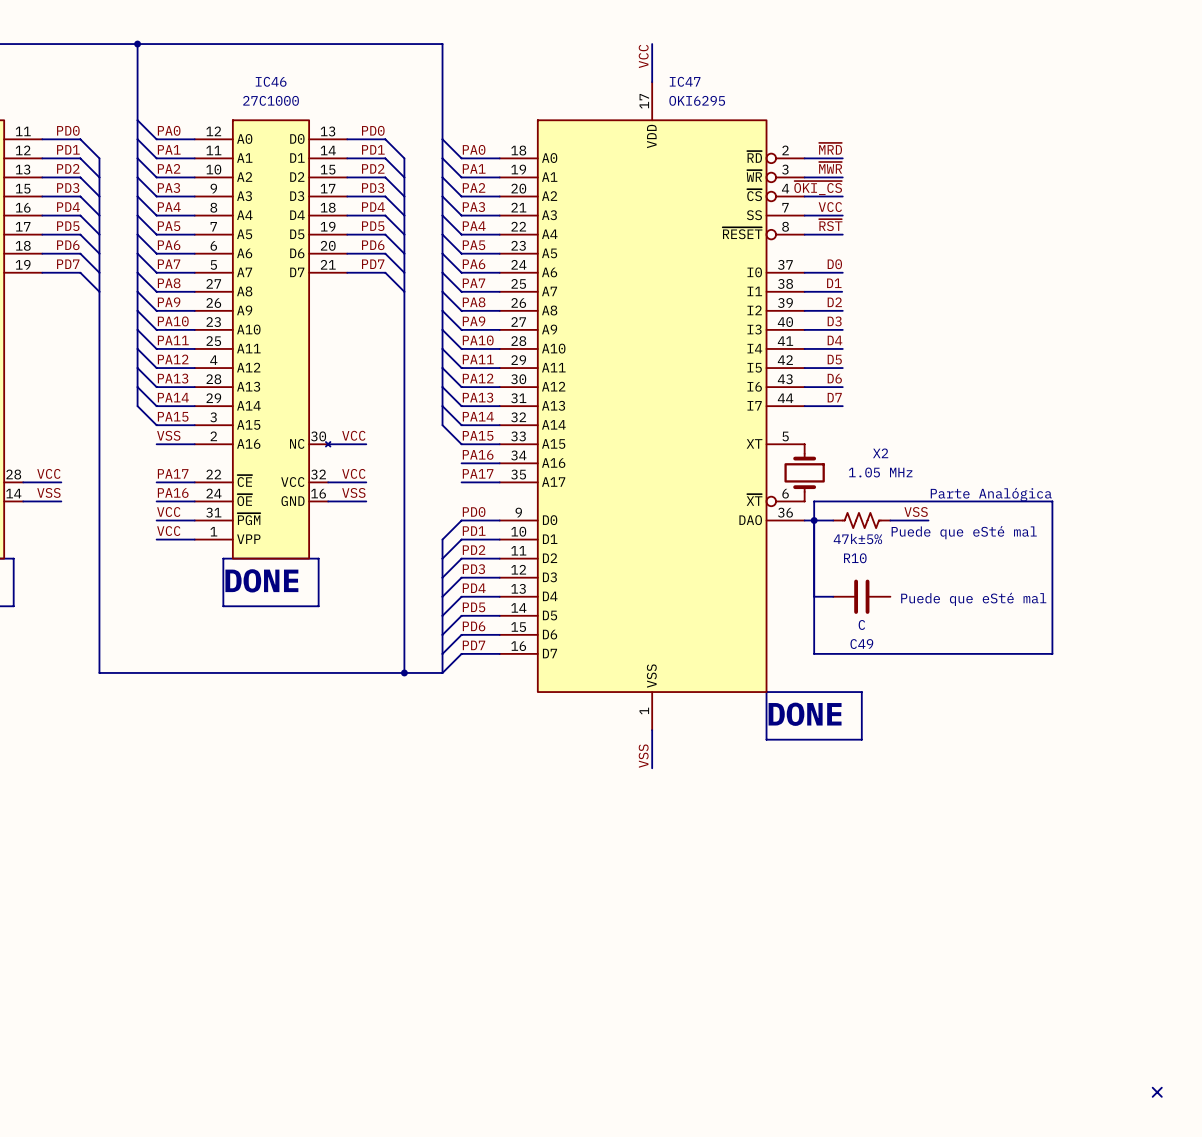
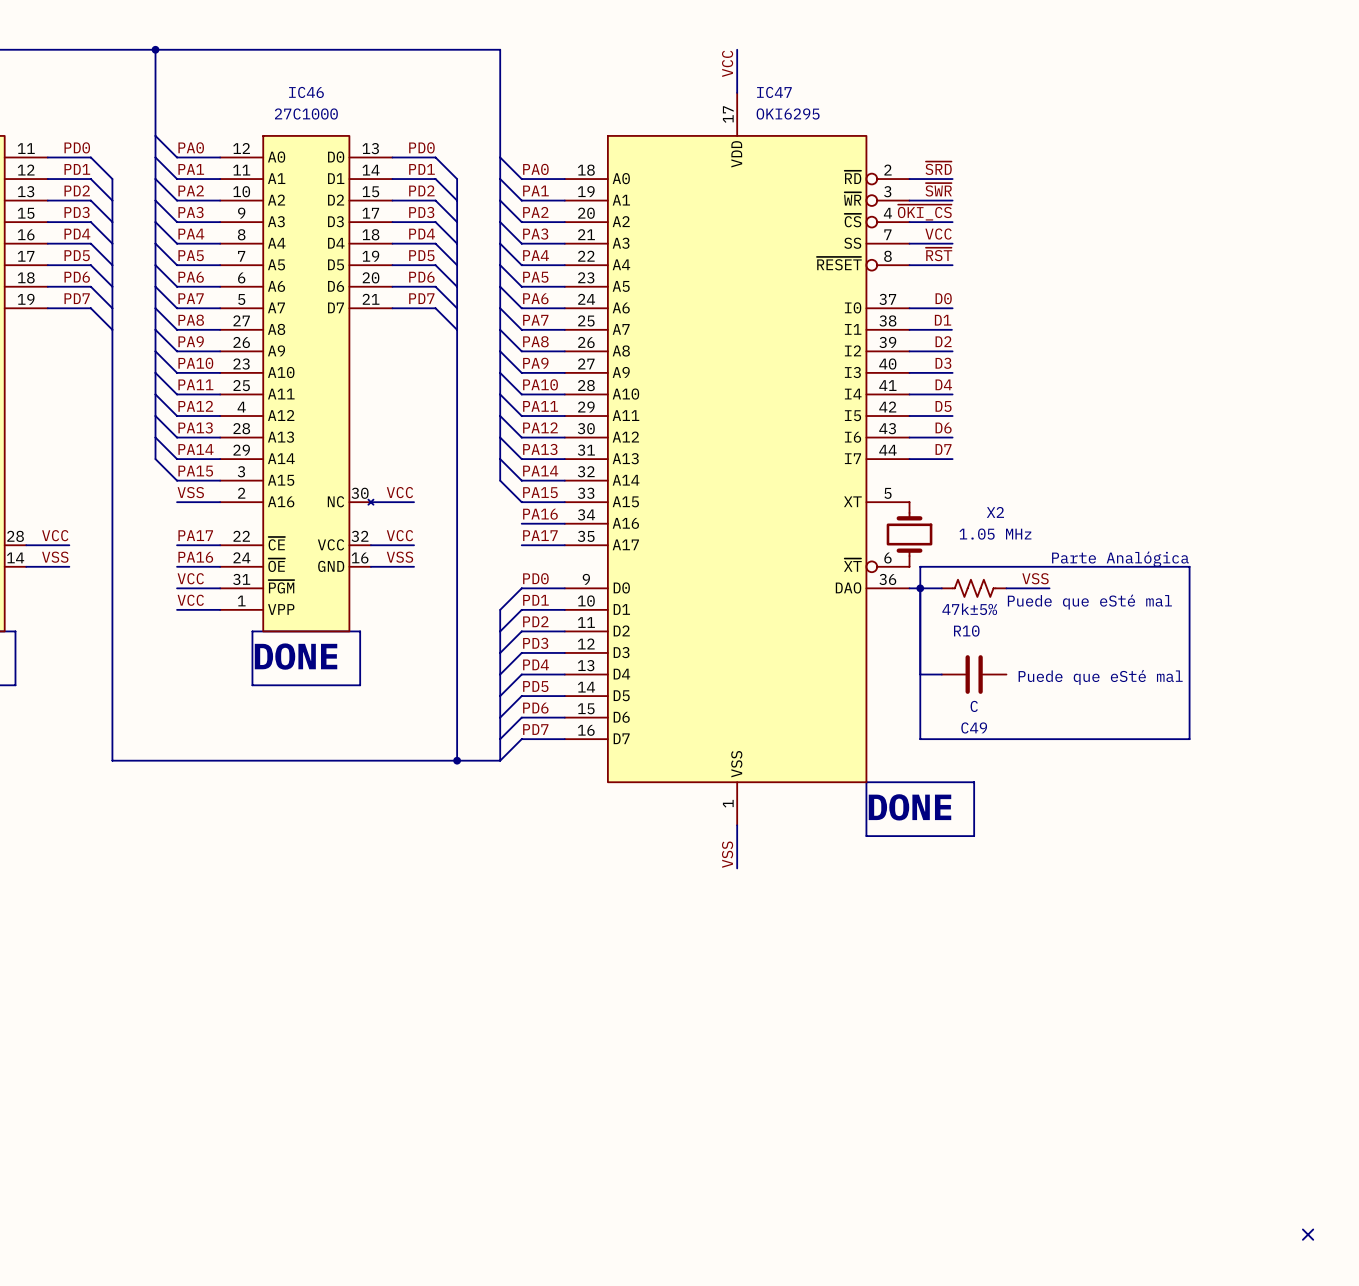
label: ~{MRD} (830, 148) -> ~{SRD} (938, 168)
label: ~{MWR} (830, 167) -> ~{SWR} (938, 189)

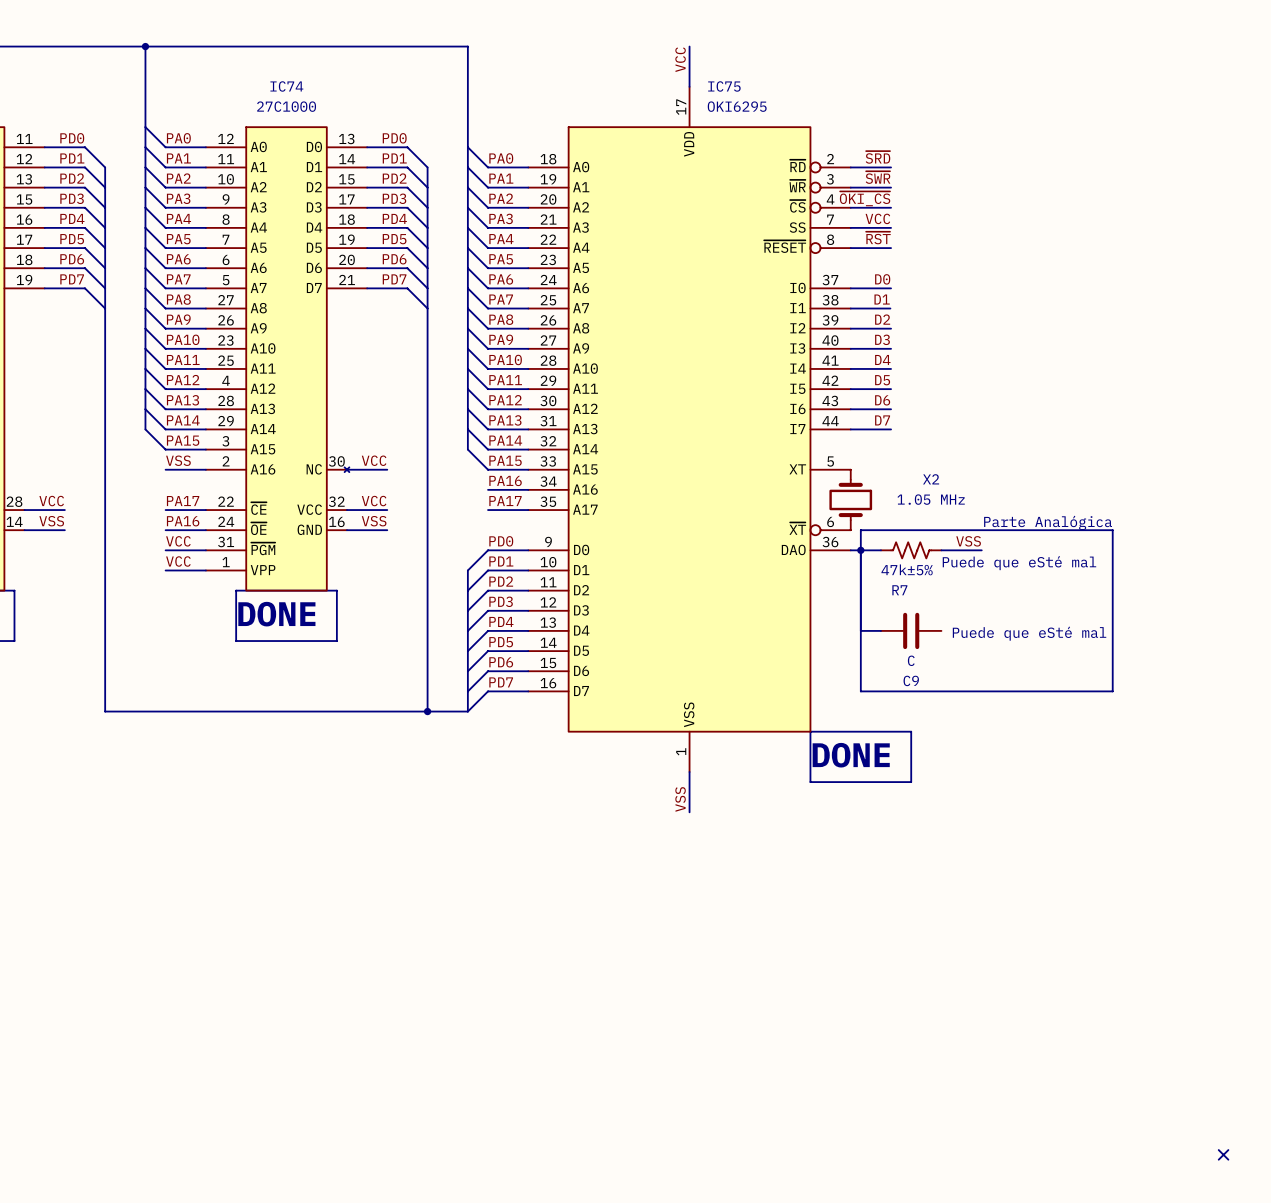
IC46 name: IC46 (306, 92) -> IC74 (286, 86)
IC47 name: IC47 (774, 92) -> IC75 (724, 86)
R10 name: R10 (966, 631) -> R7 (899, 590)
C49 name: C49 (974, 727) -> C9 (911, 680)

